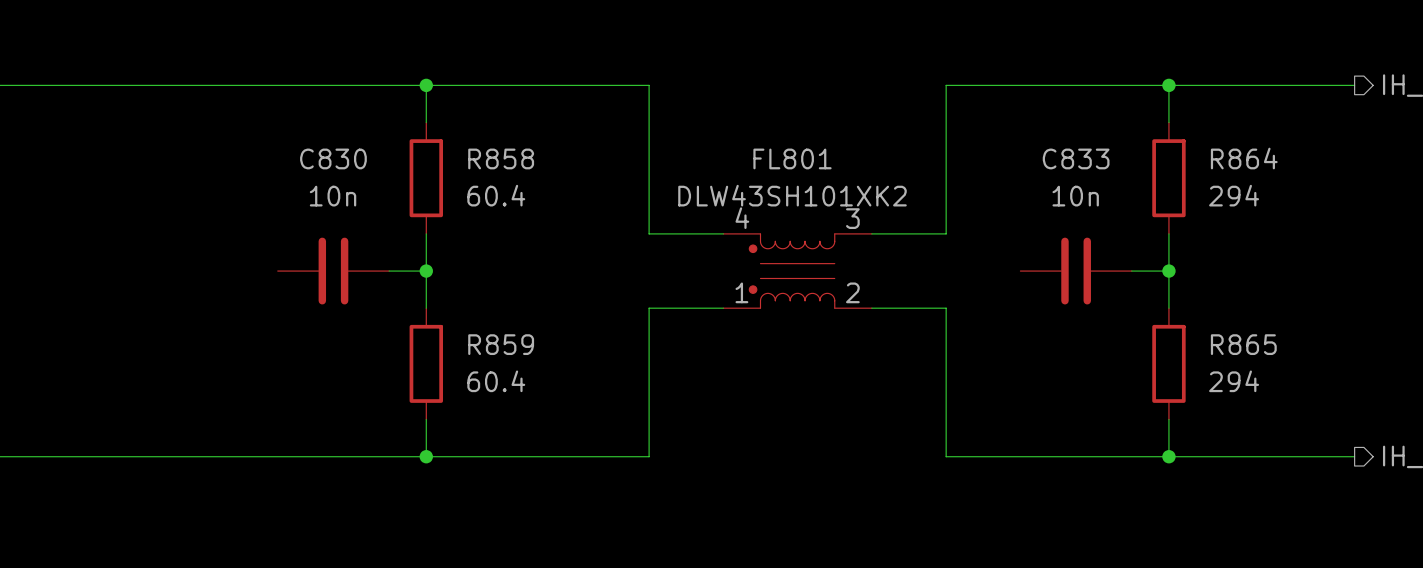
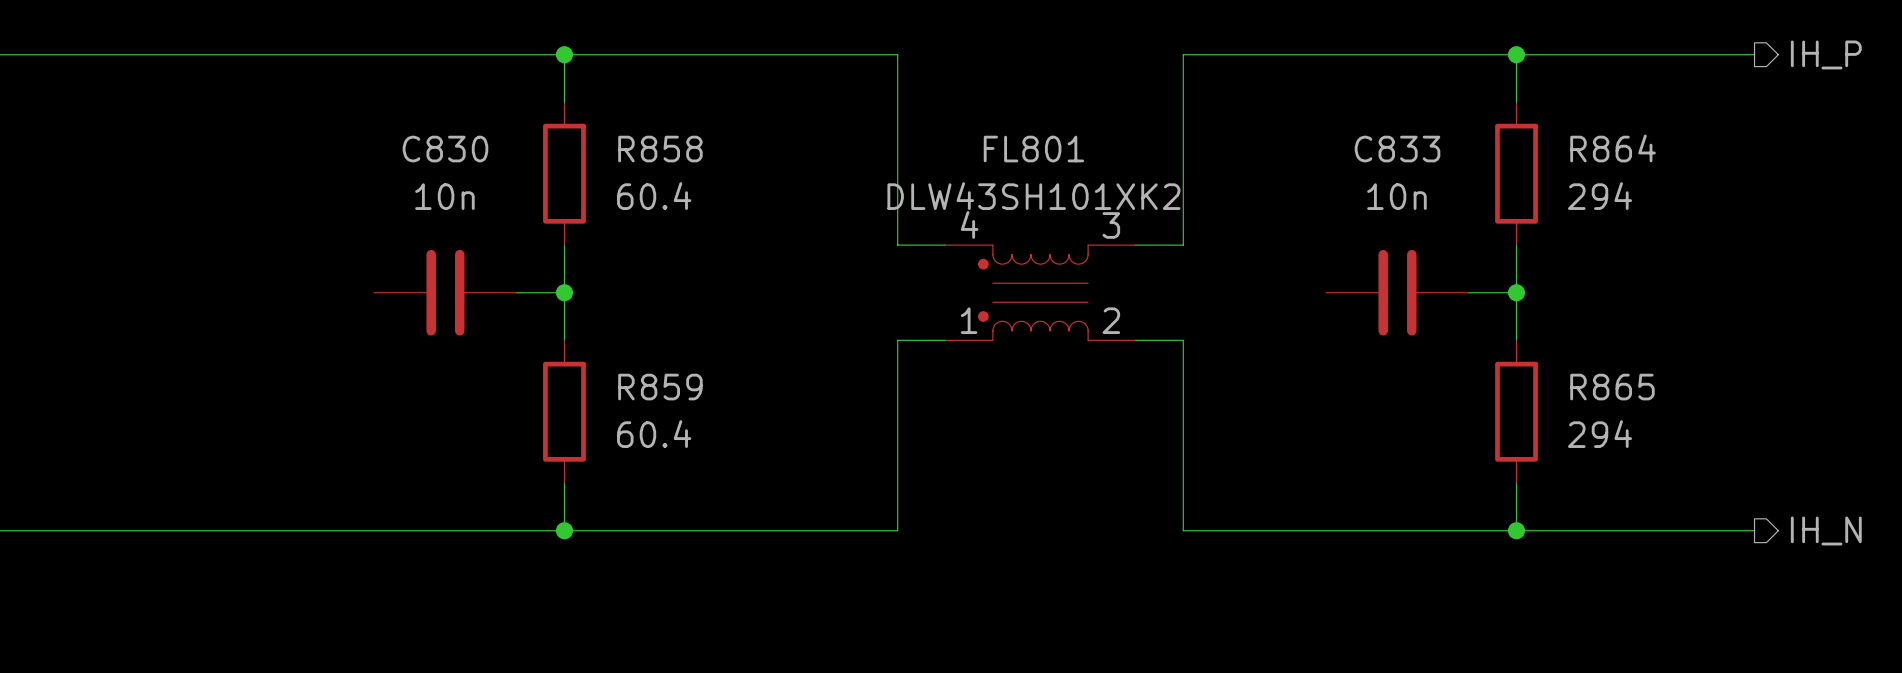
wire: (649, 85) (649, 233) (686, 233) -> (850, 54) (897, 54) (897, 245)
wire: (946, 85) (946, 233) (909, 233) -> (1230, 54) (1183, 54) (1183, 245)
wire: (686, 308) (649, 308) (649, 456) -> (897, 340) (897, 530) (850, 530)
wire: (909, 308) (946, 308) (946, 456) -> (1183, 340) (1183, 530) (1230, 530)

